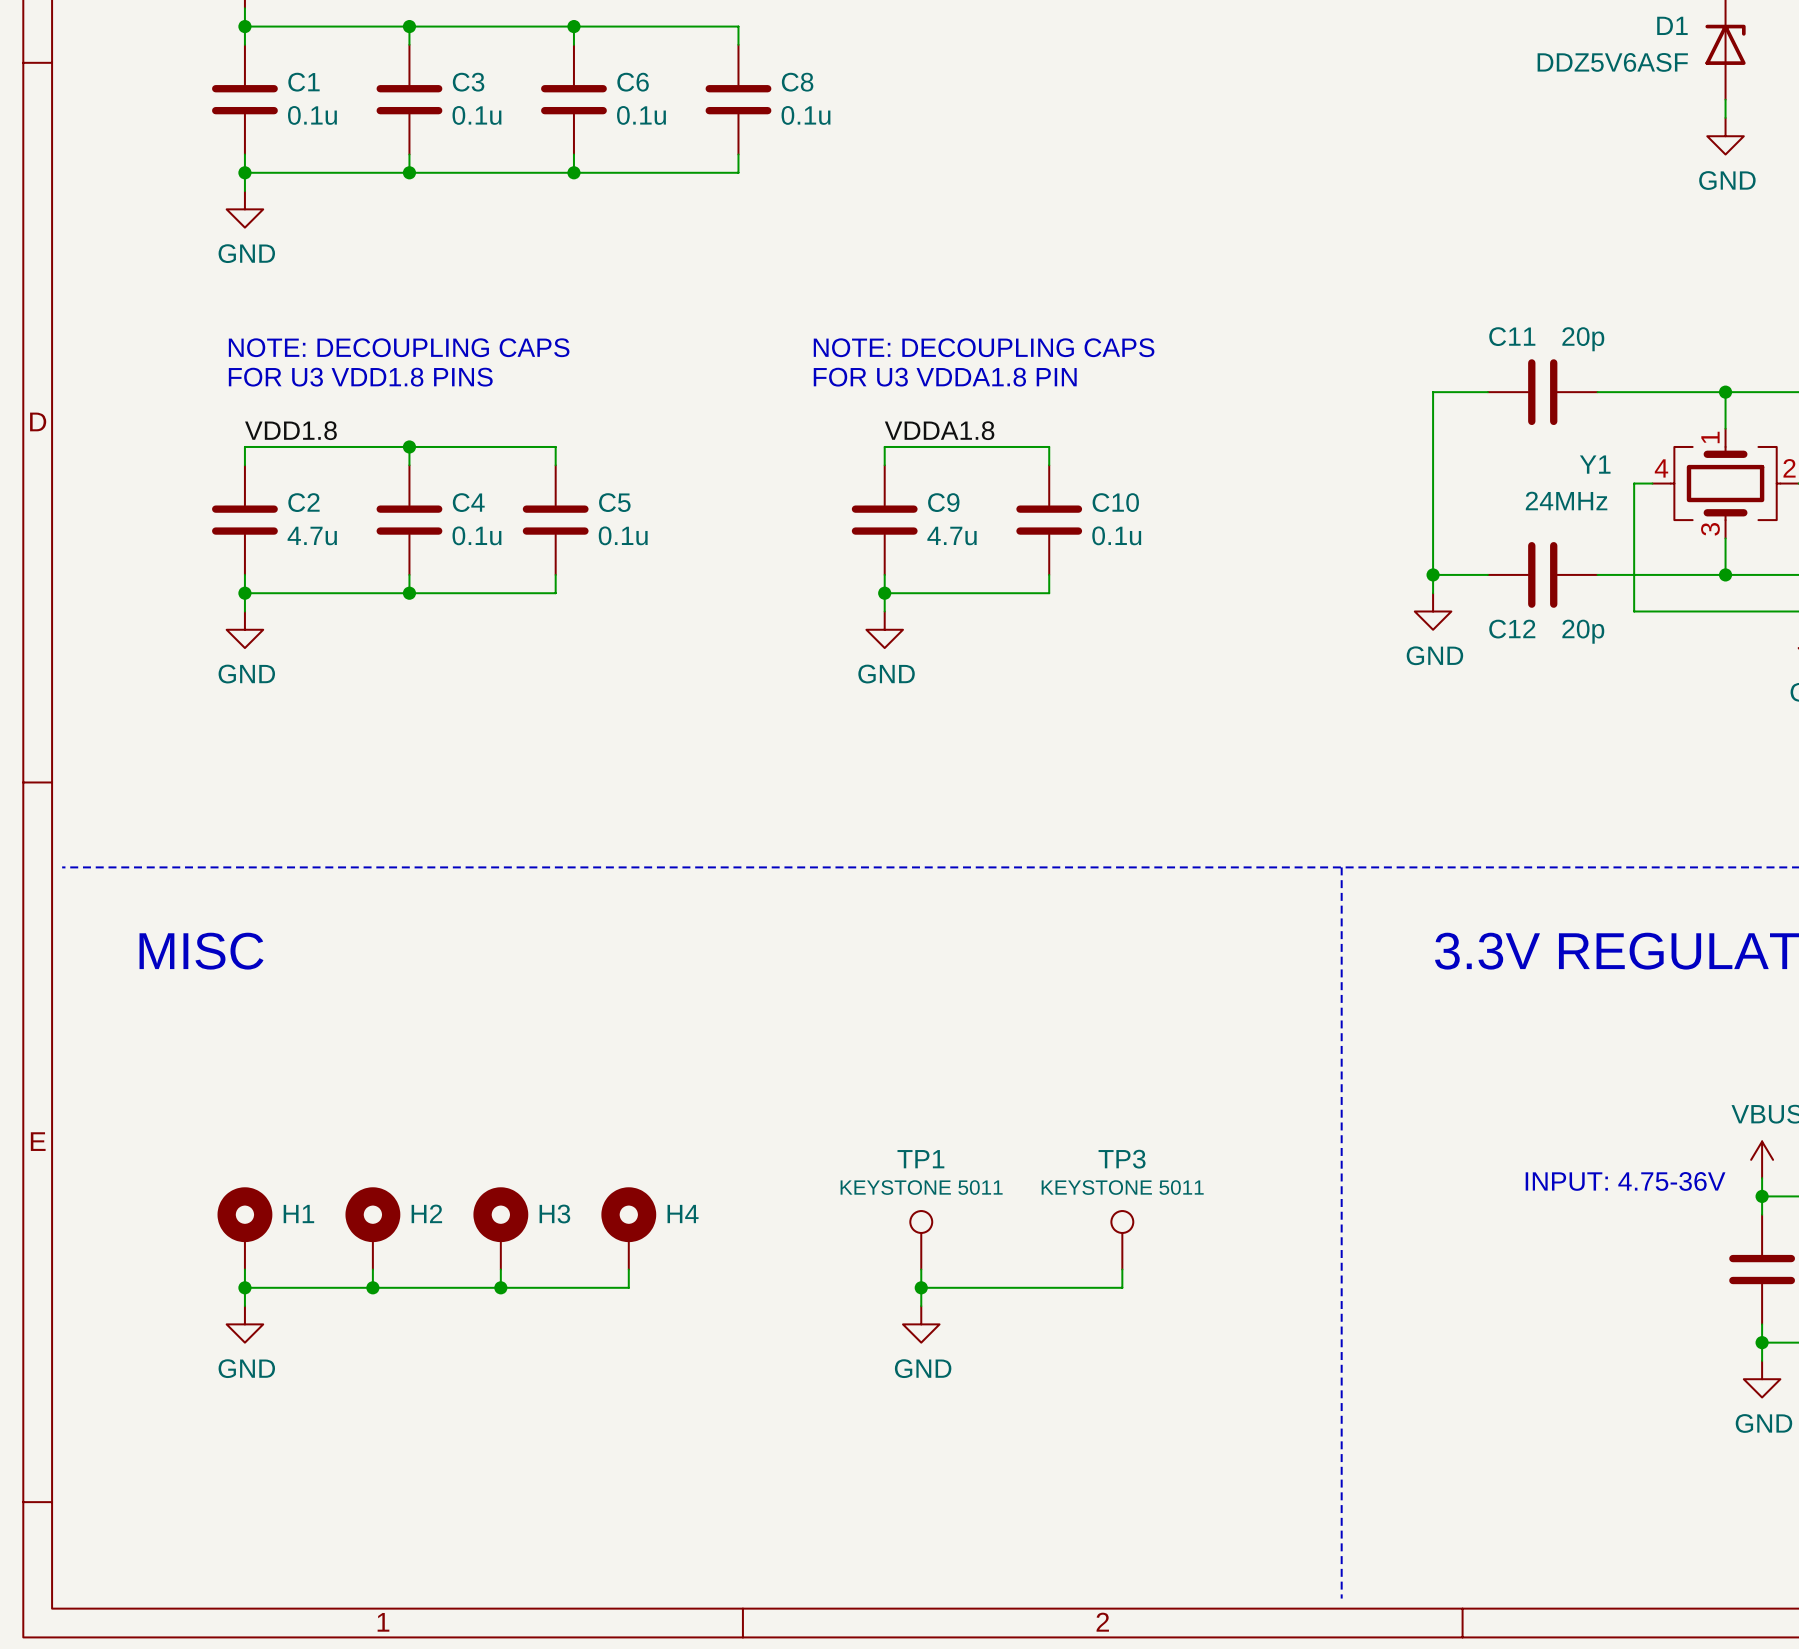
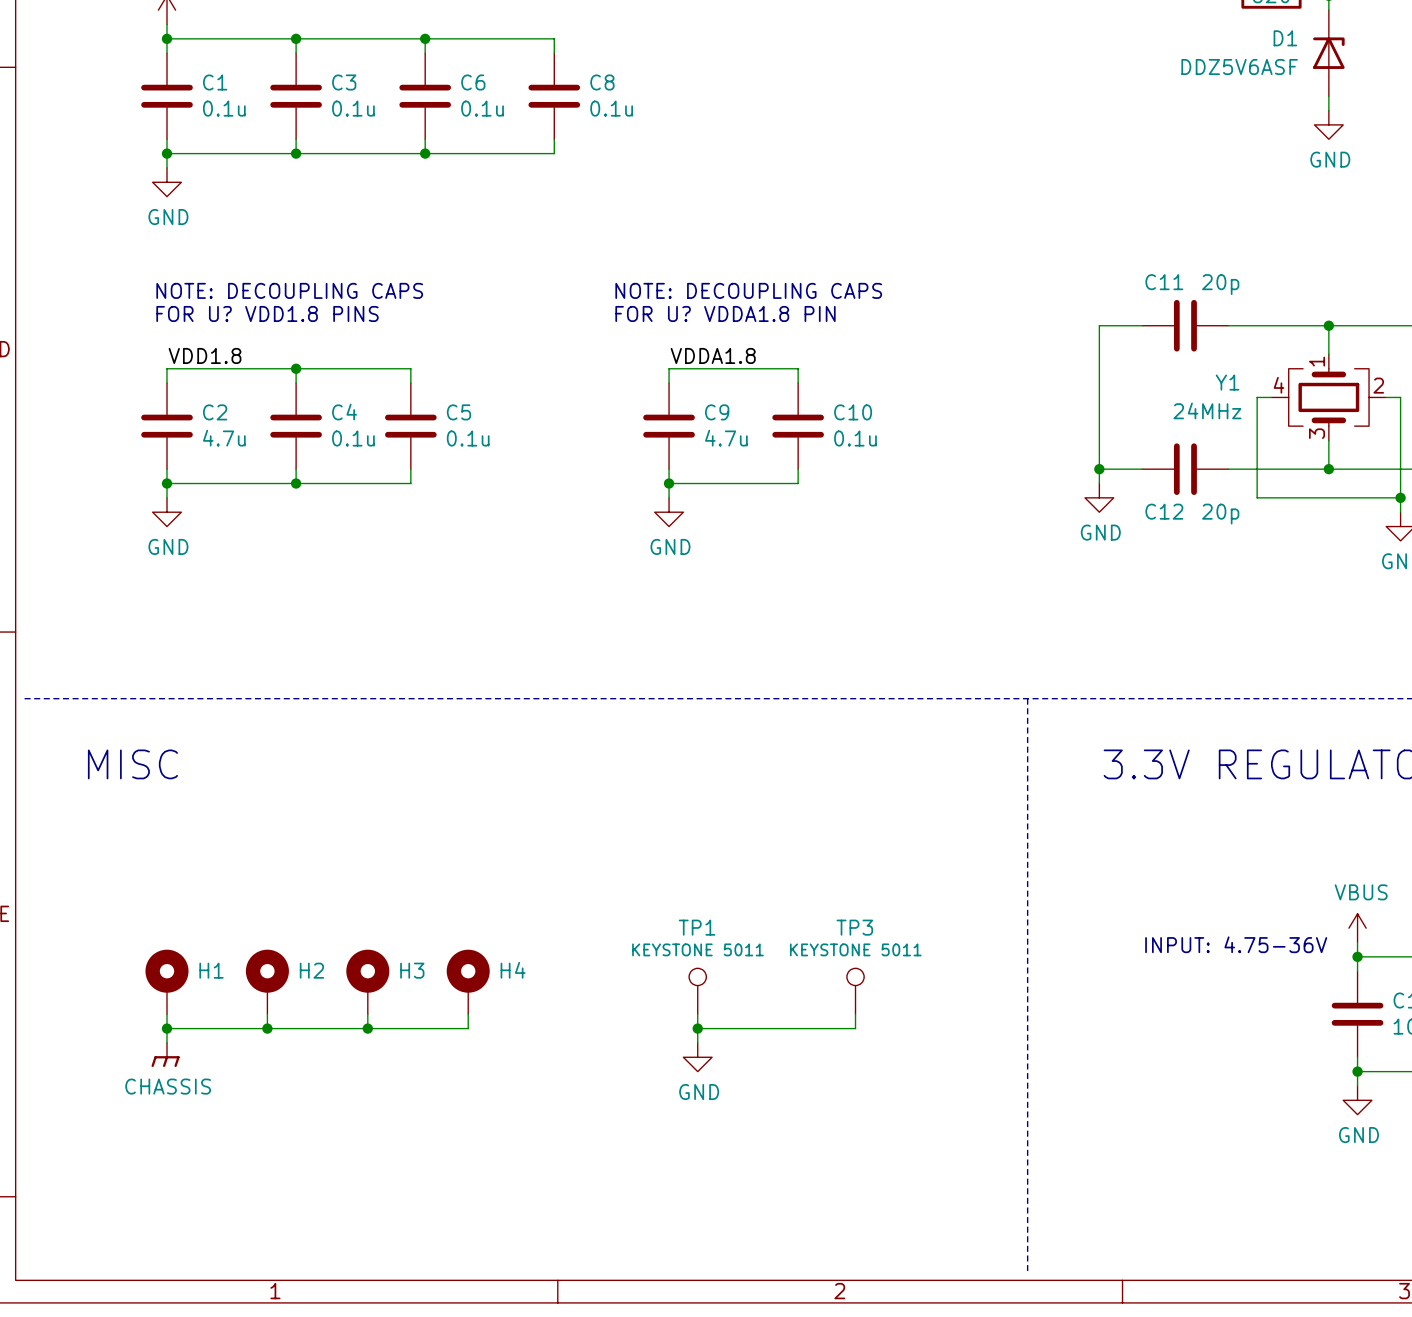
text: FOR U3 VDD1.8 PINS (360, 377) -> FOR U? VDD1.8 PINS (267, 313)
text: FOR U3 VDDA1.8 PIN (945, 377) -> FOR U? VDDA1.8 PIN (725, 313)
power symbol: GND (244, 1324) -> CHASSIS (165, 1054)

